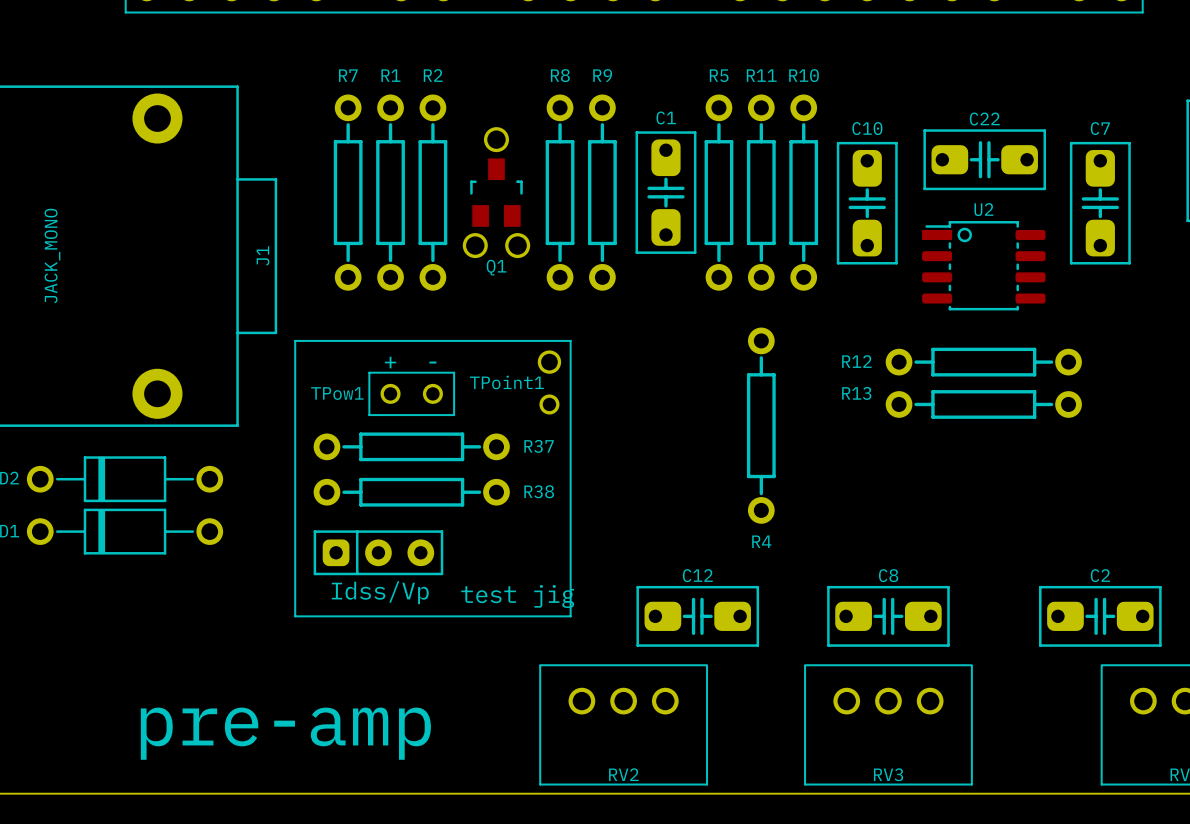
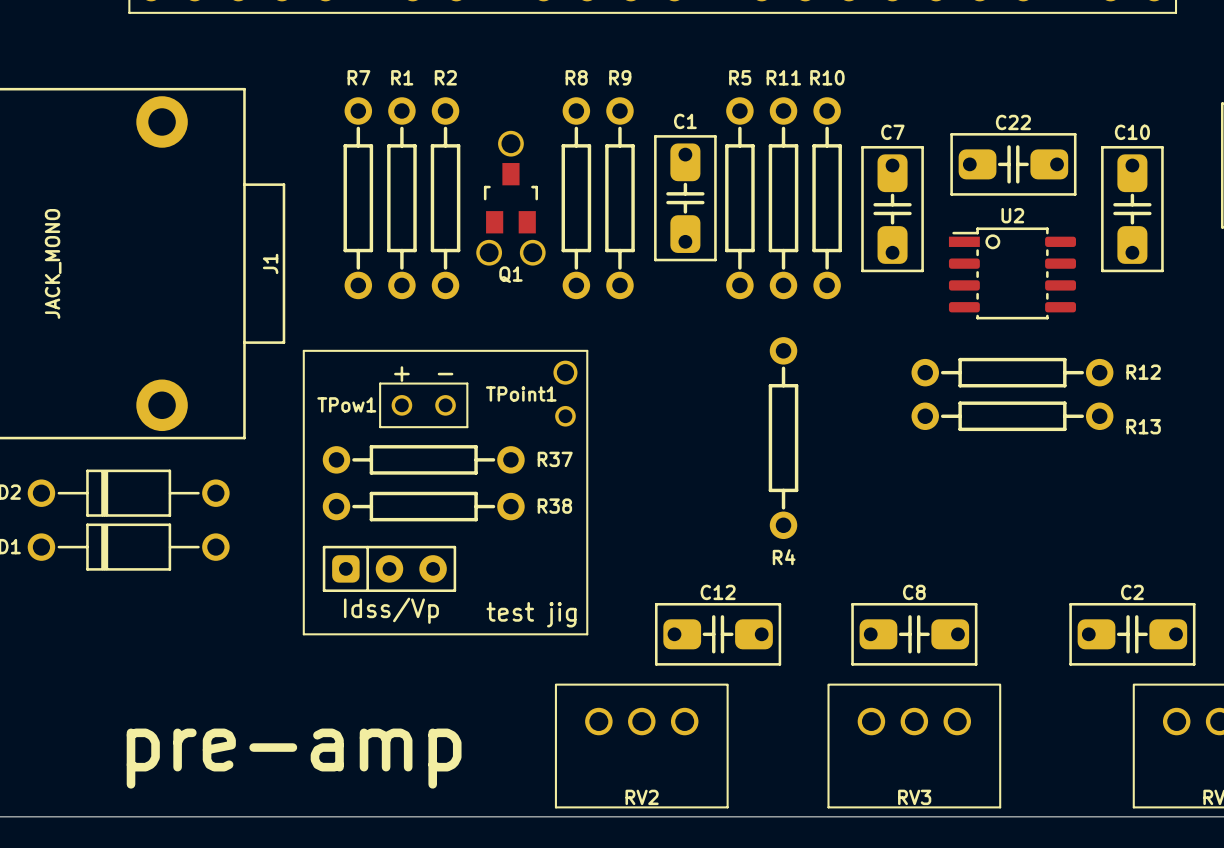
C10 name: C10 (867, 128) -> C7 (892, 132)
C7 name: C7 (1100, 128) -> C10 (1132, 132)
R12 name position: R12 (856, 361) -> R12 (1143, 372)
R13 name position: R13 (856, 393) -> R13 (1143, 426)

